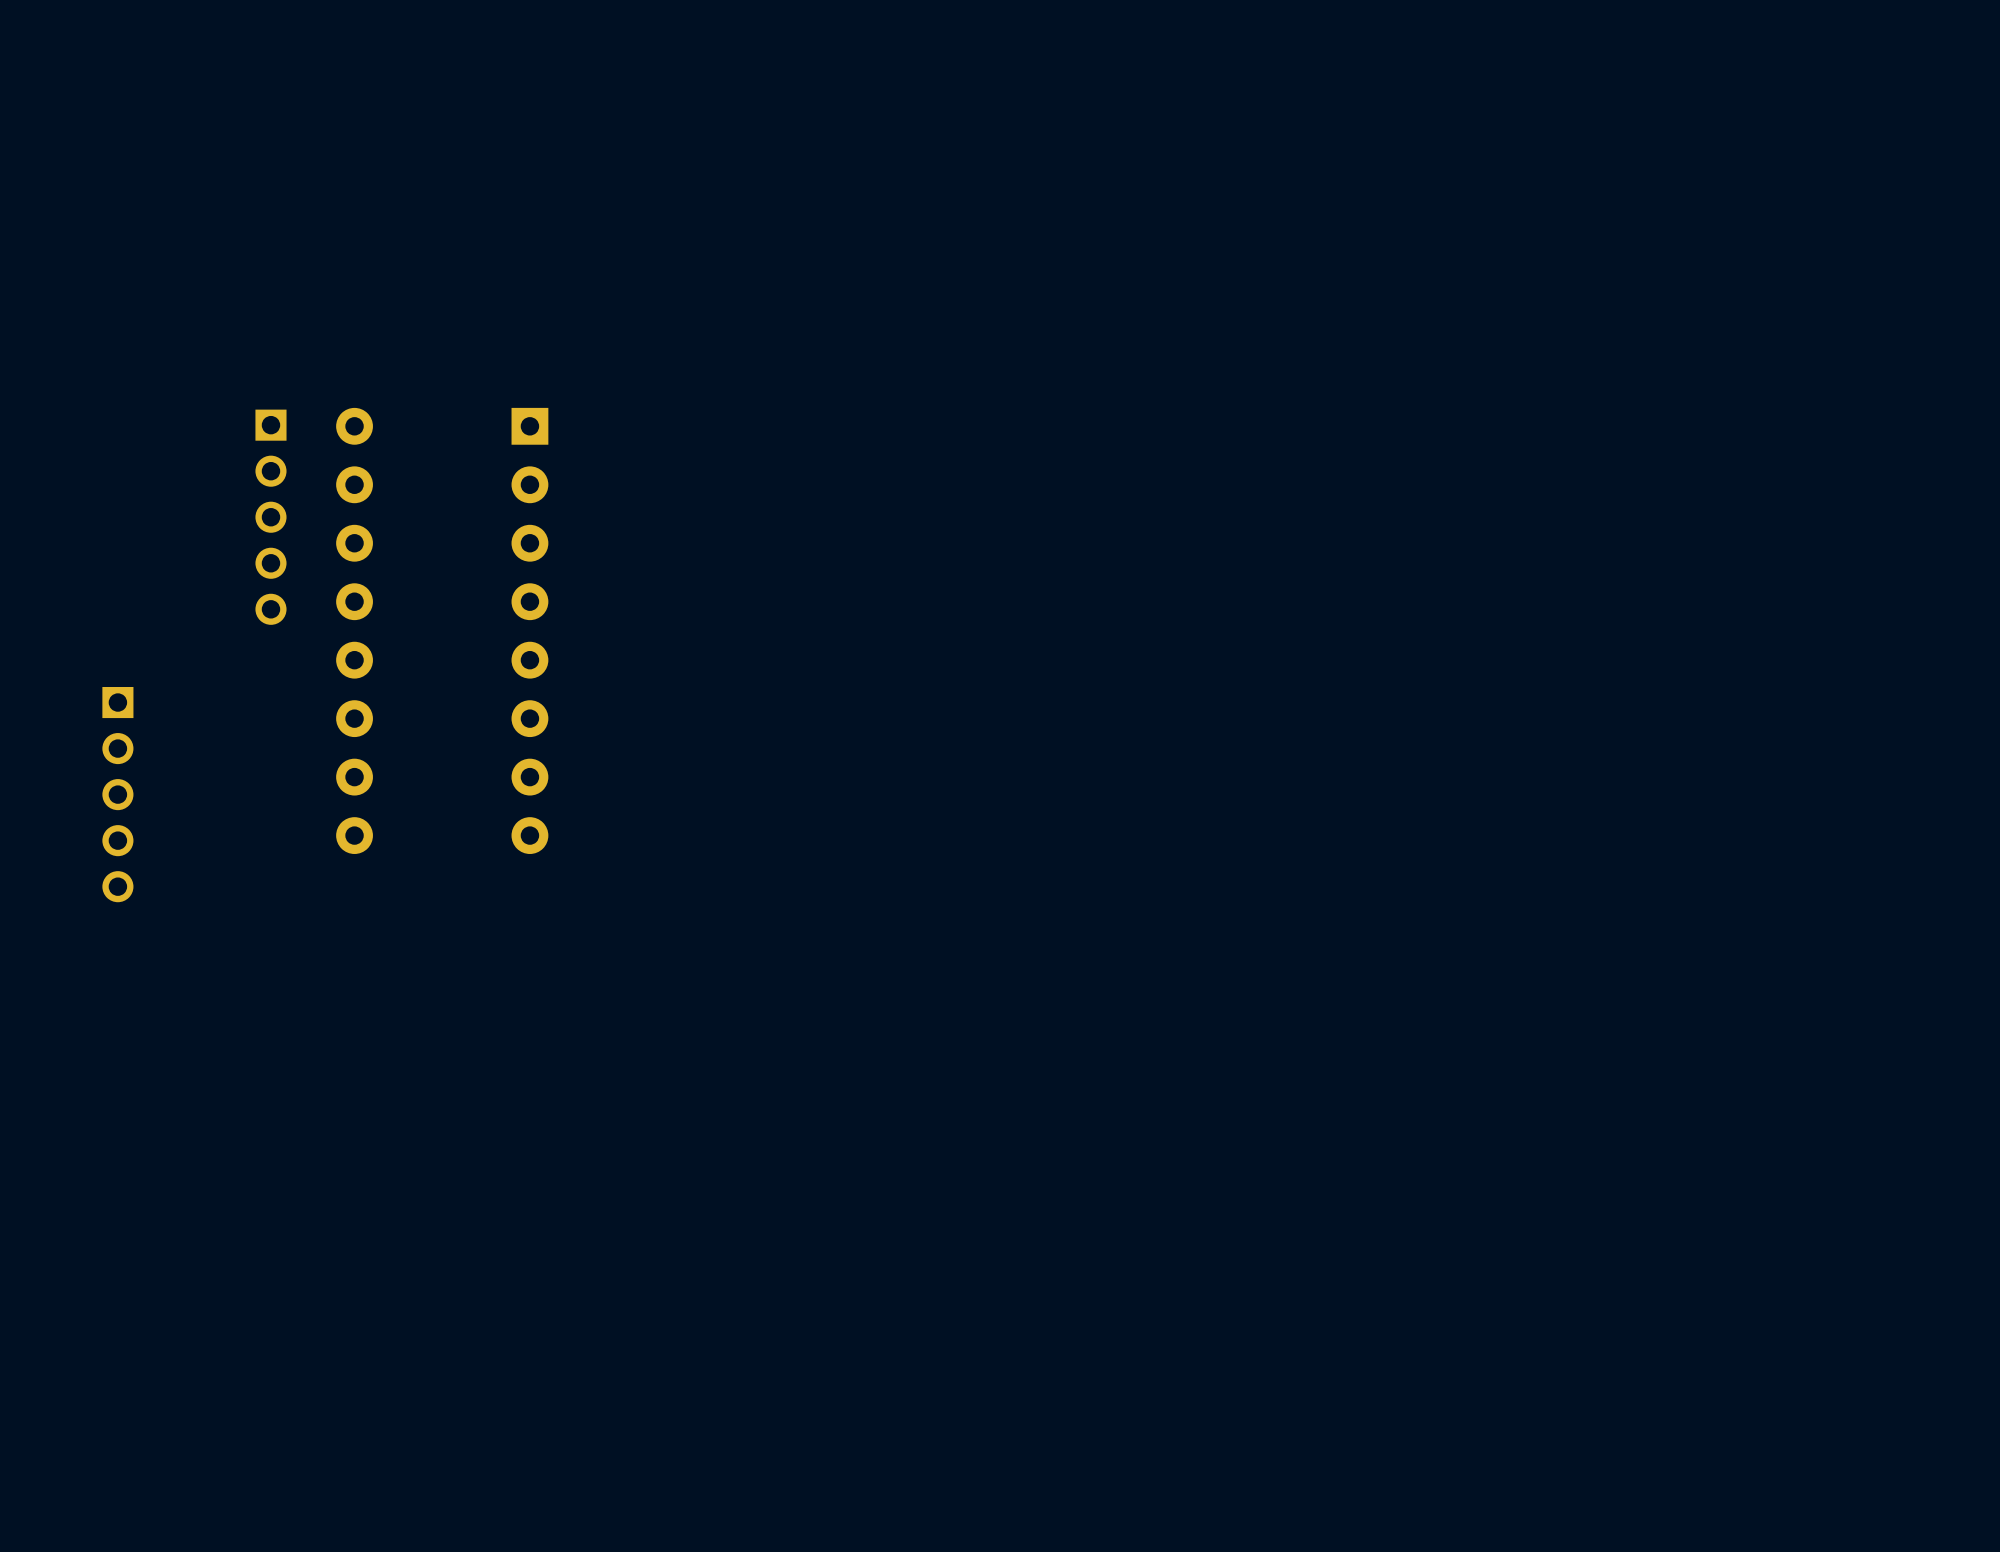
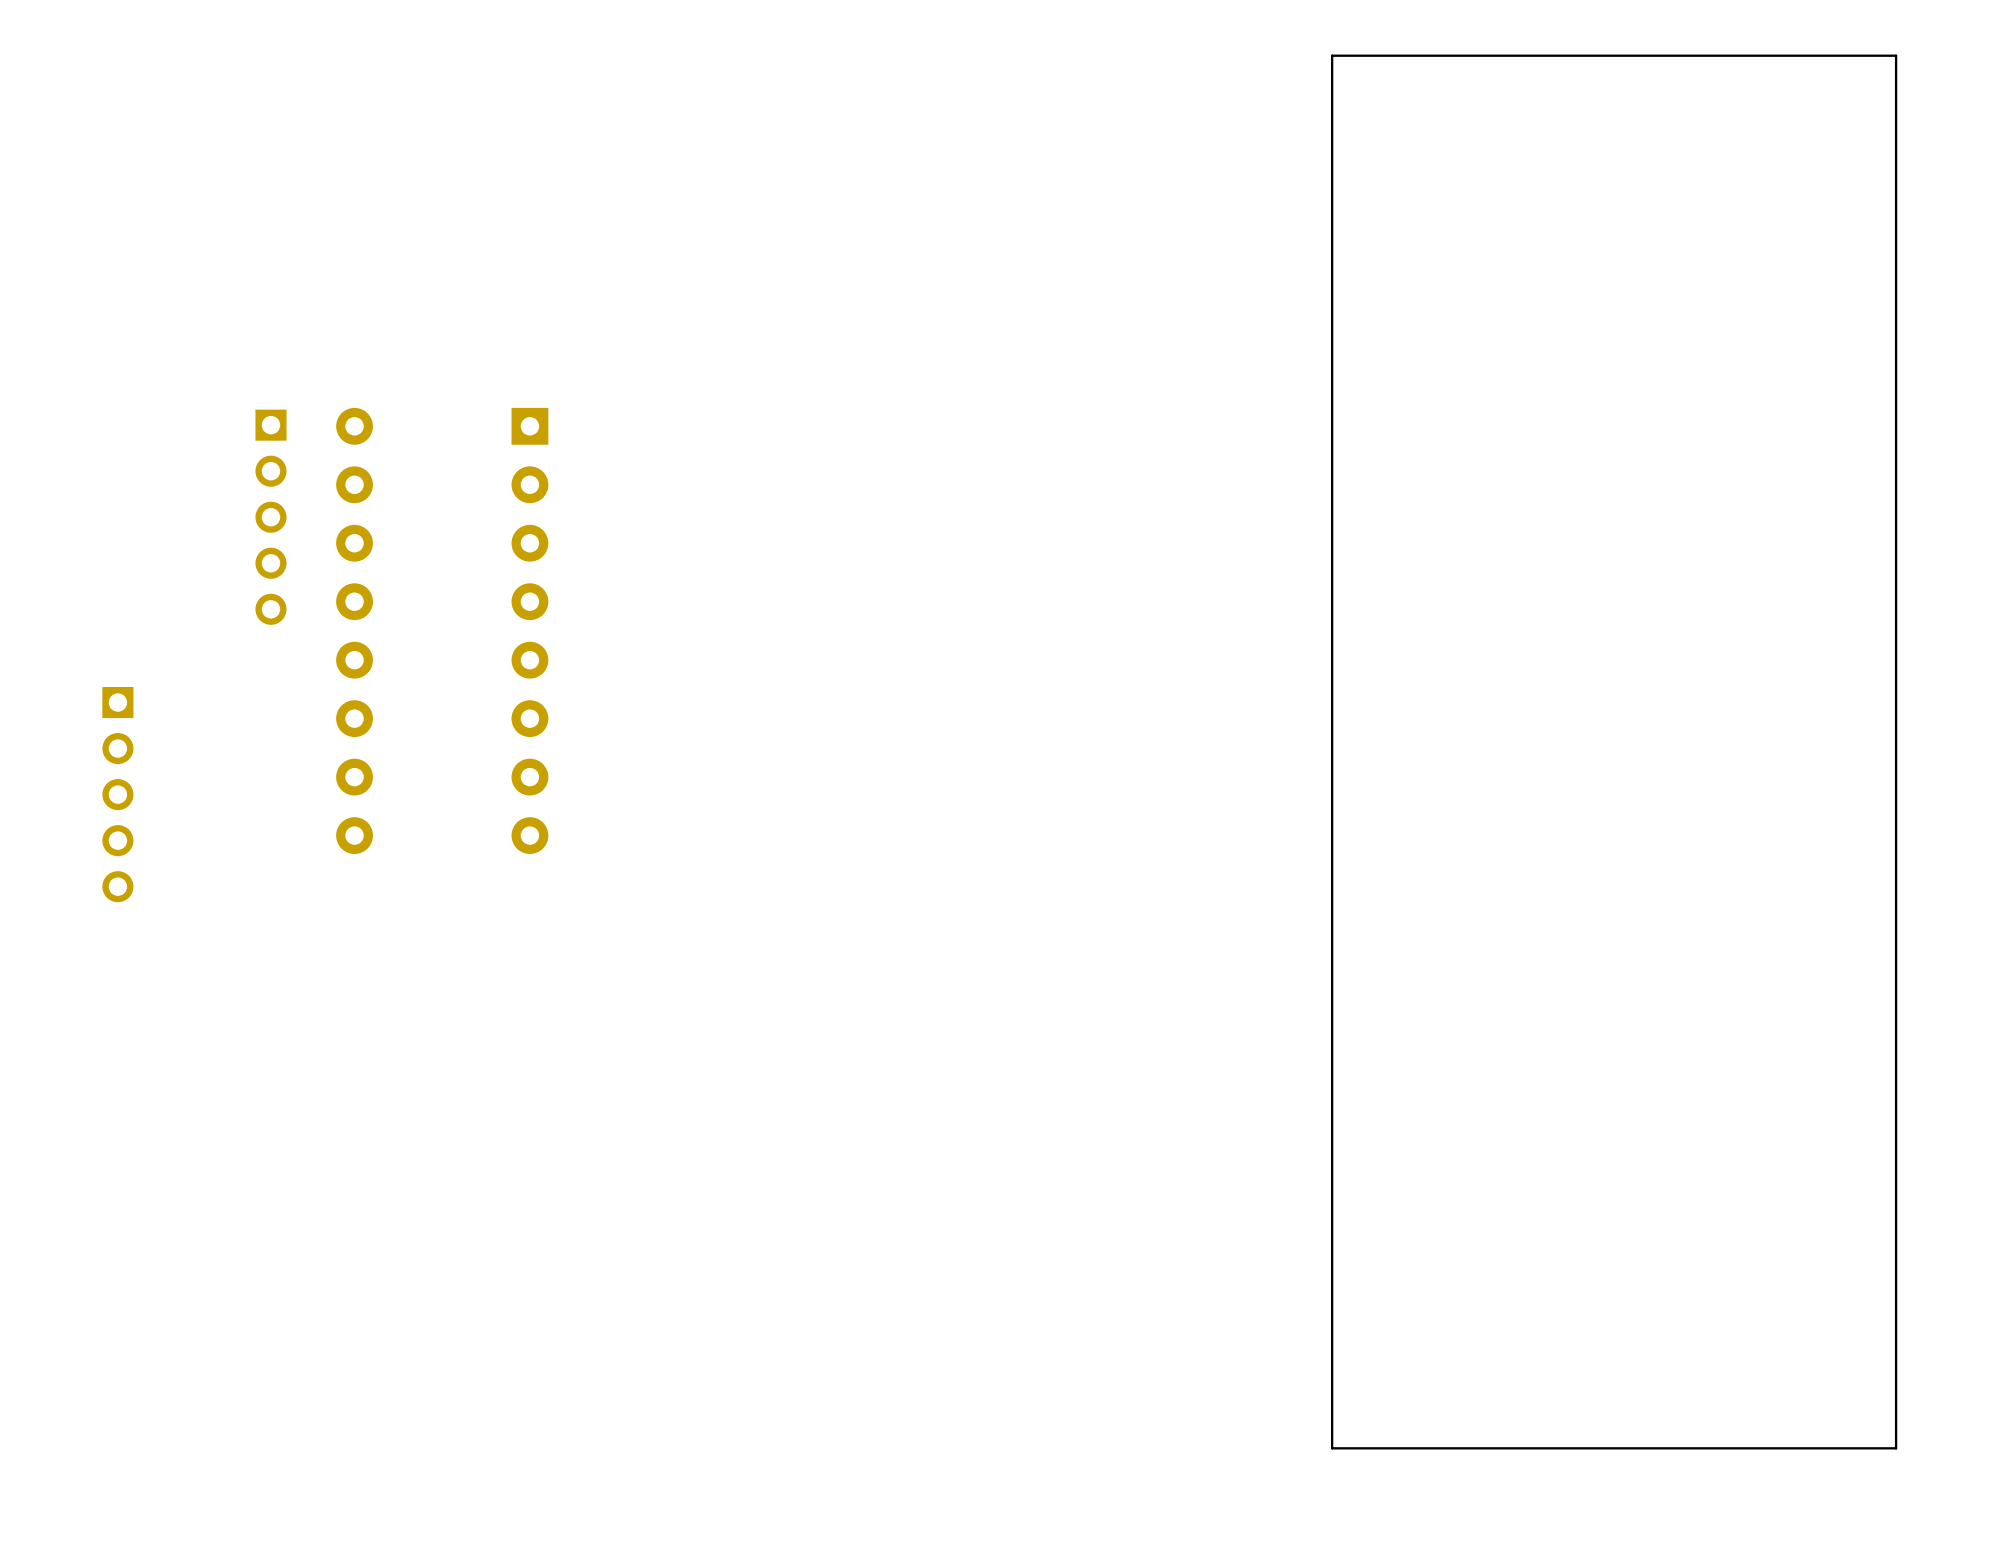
board edge: none -> (1896, 55) (1332, 55) (1332, 1448) (1896, 1448) (1896, 55)

